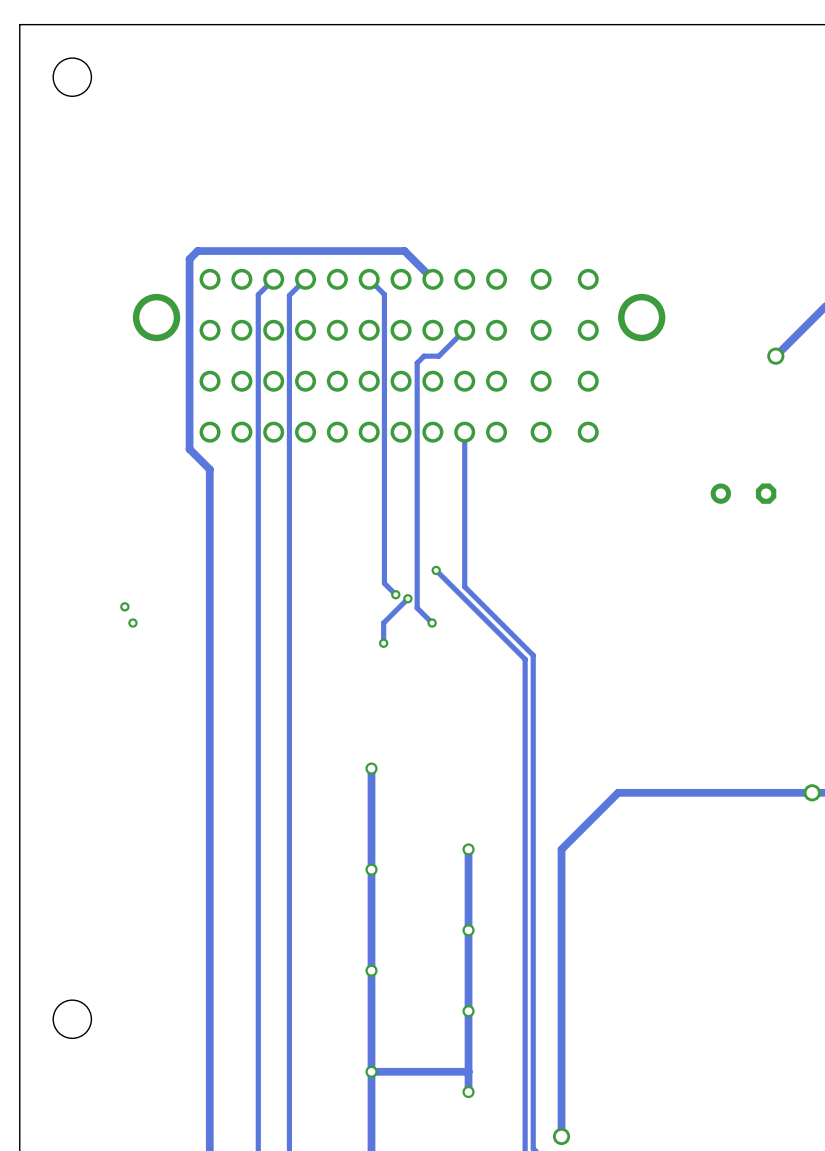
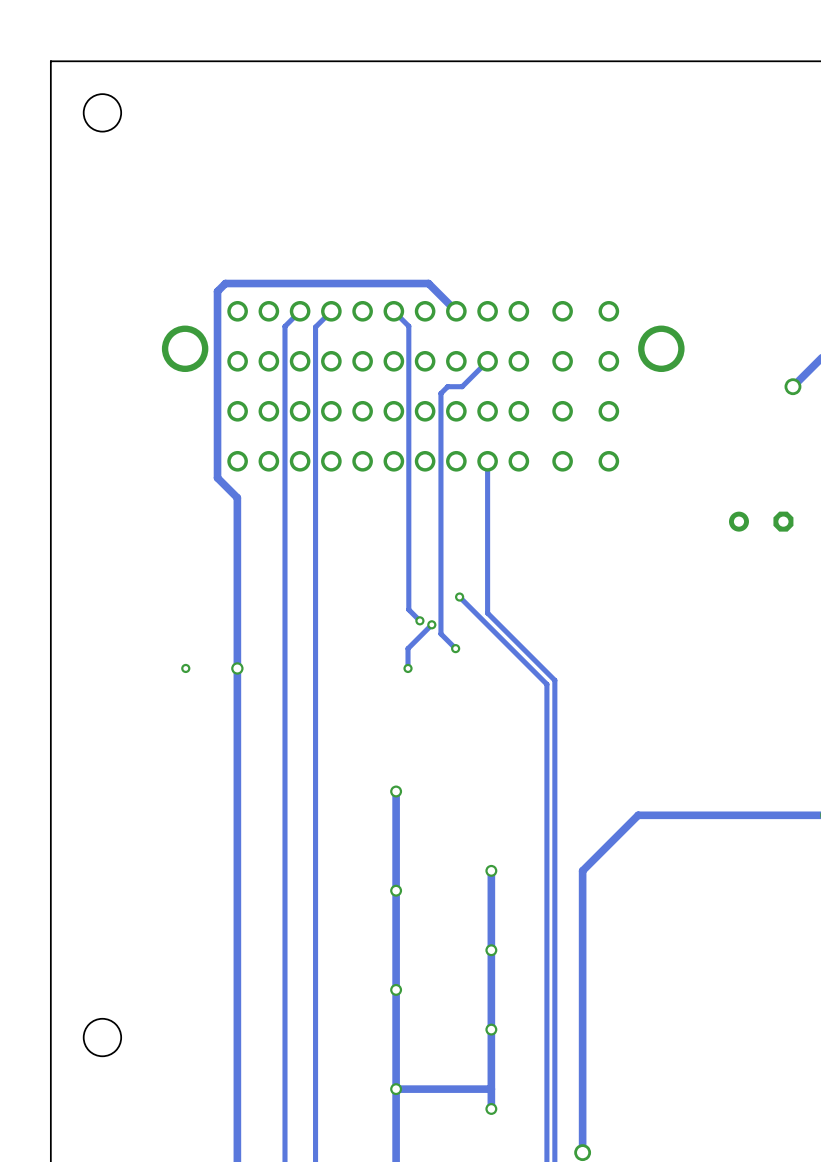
via: (124, 606) -> none
via: (132, 623) -> none
via: none -> (185, 668)
via: none -> (237, 668)

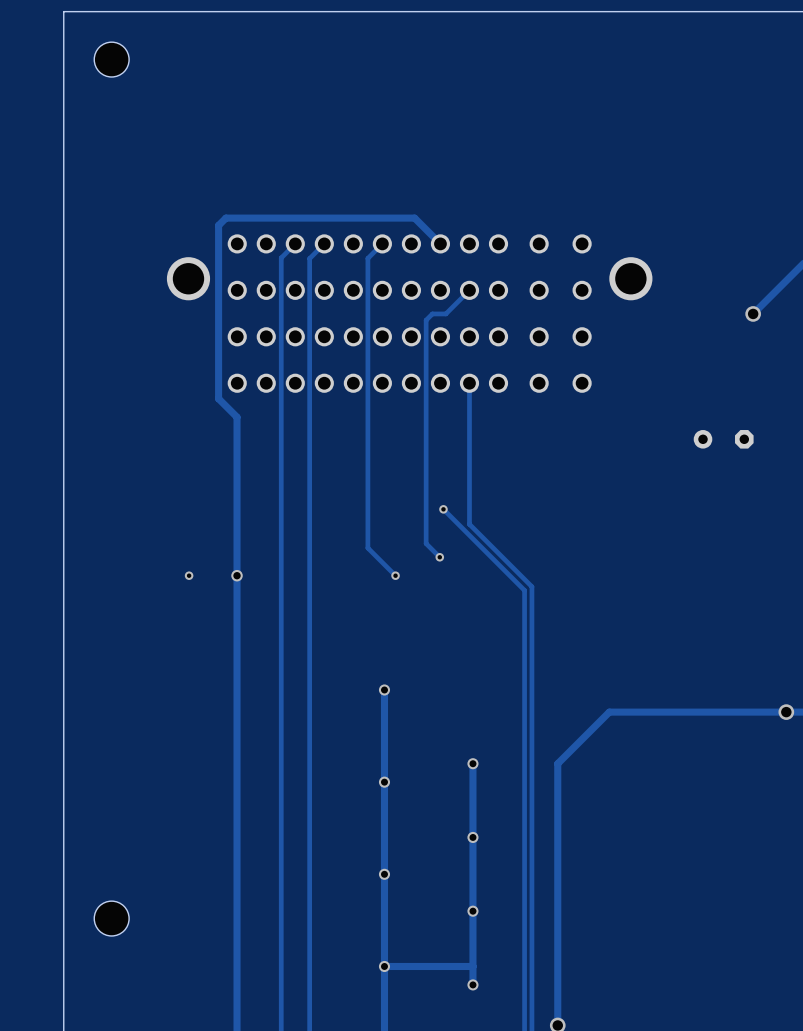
track: (393, 311) (408, 326) (408, 609) (419, 620) -> (382, 243) (367, 258) (367, 548) (395, 575)
via: (419, 620) -> none
track: (431, 624) (408, 648) (408, 668) -> none
via: (431, 624) -> none

